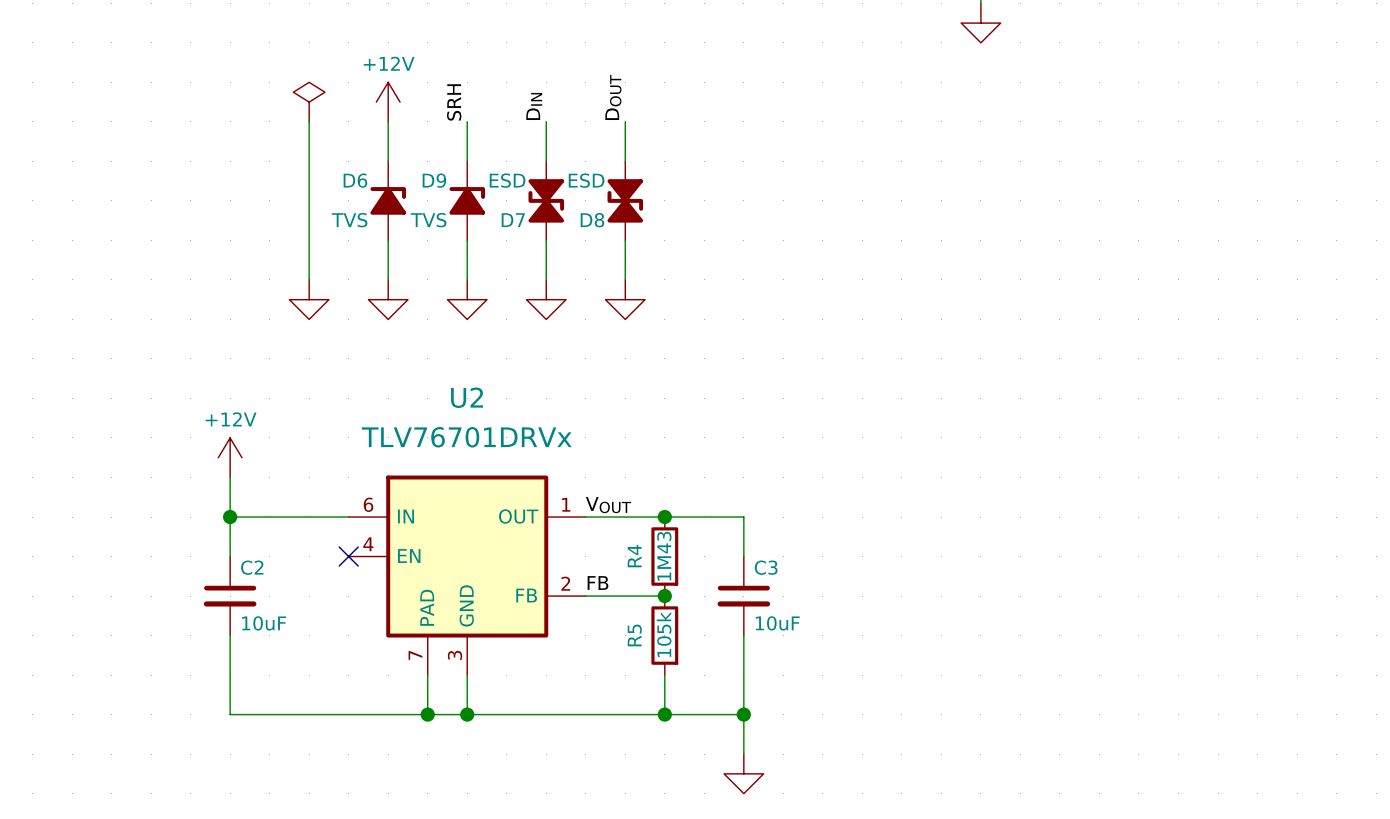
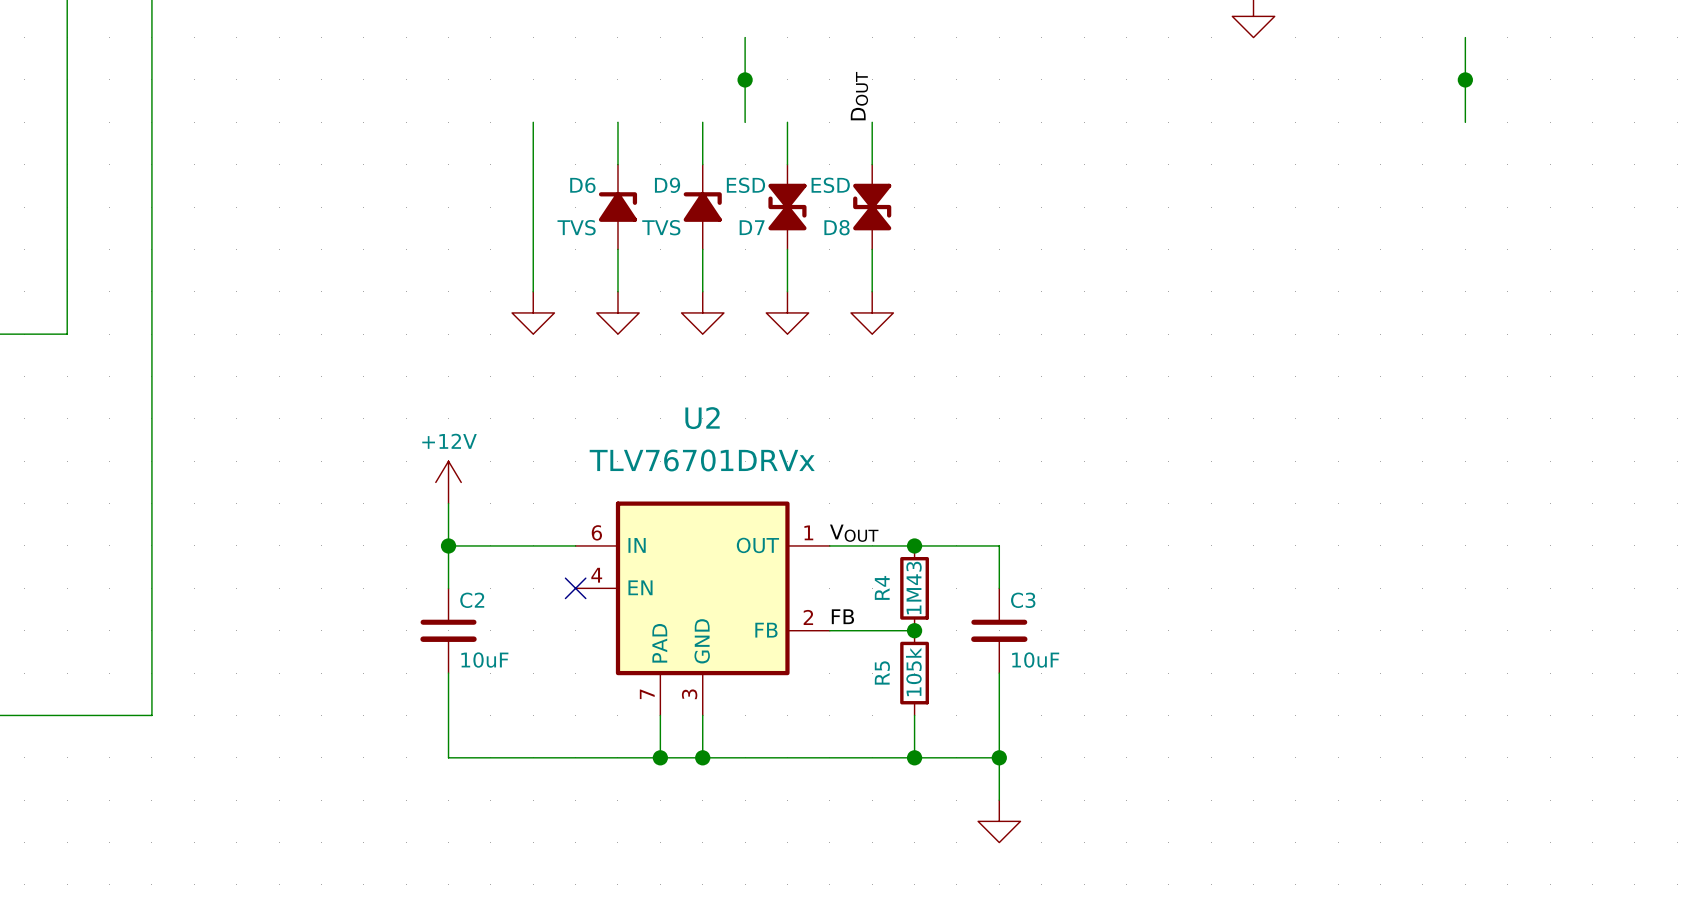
wire: none -> (745, 37) (745, 122)
wire: none -> (1465, 37) (1465, 122)
junction: none -> (745, 79)
junction: none -> (1465, 79)
power symbol: (309, 102) -> none
power symbol: +12V (388, 102) -> none
label: SRH (454, 102) -> none
label: DIN (534, 106) -> none

